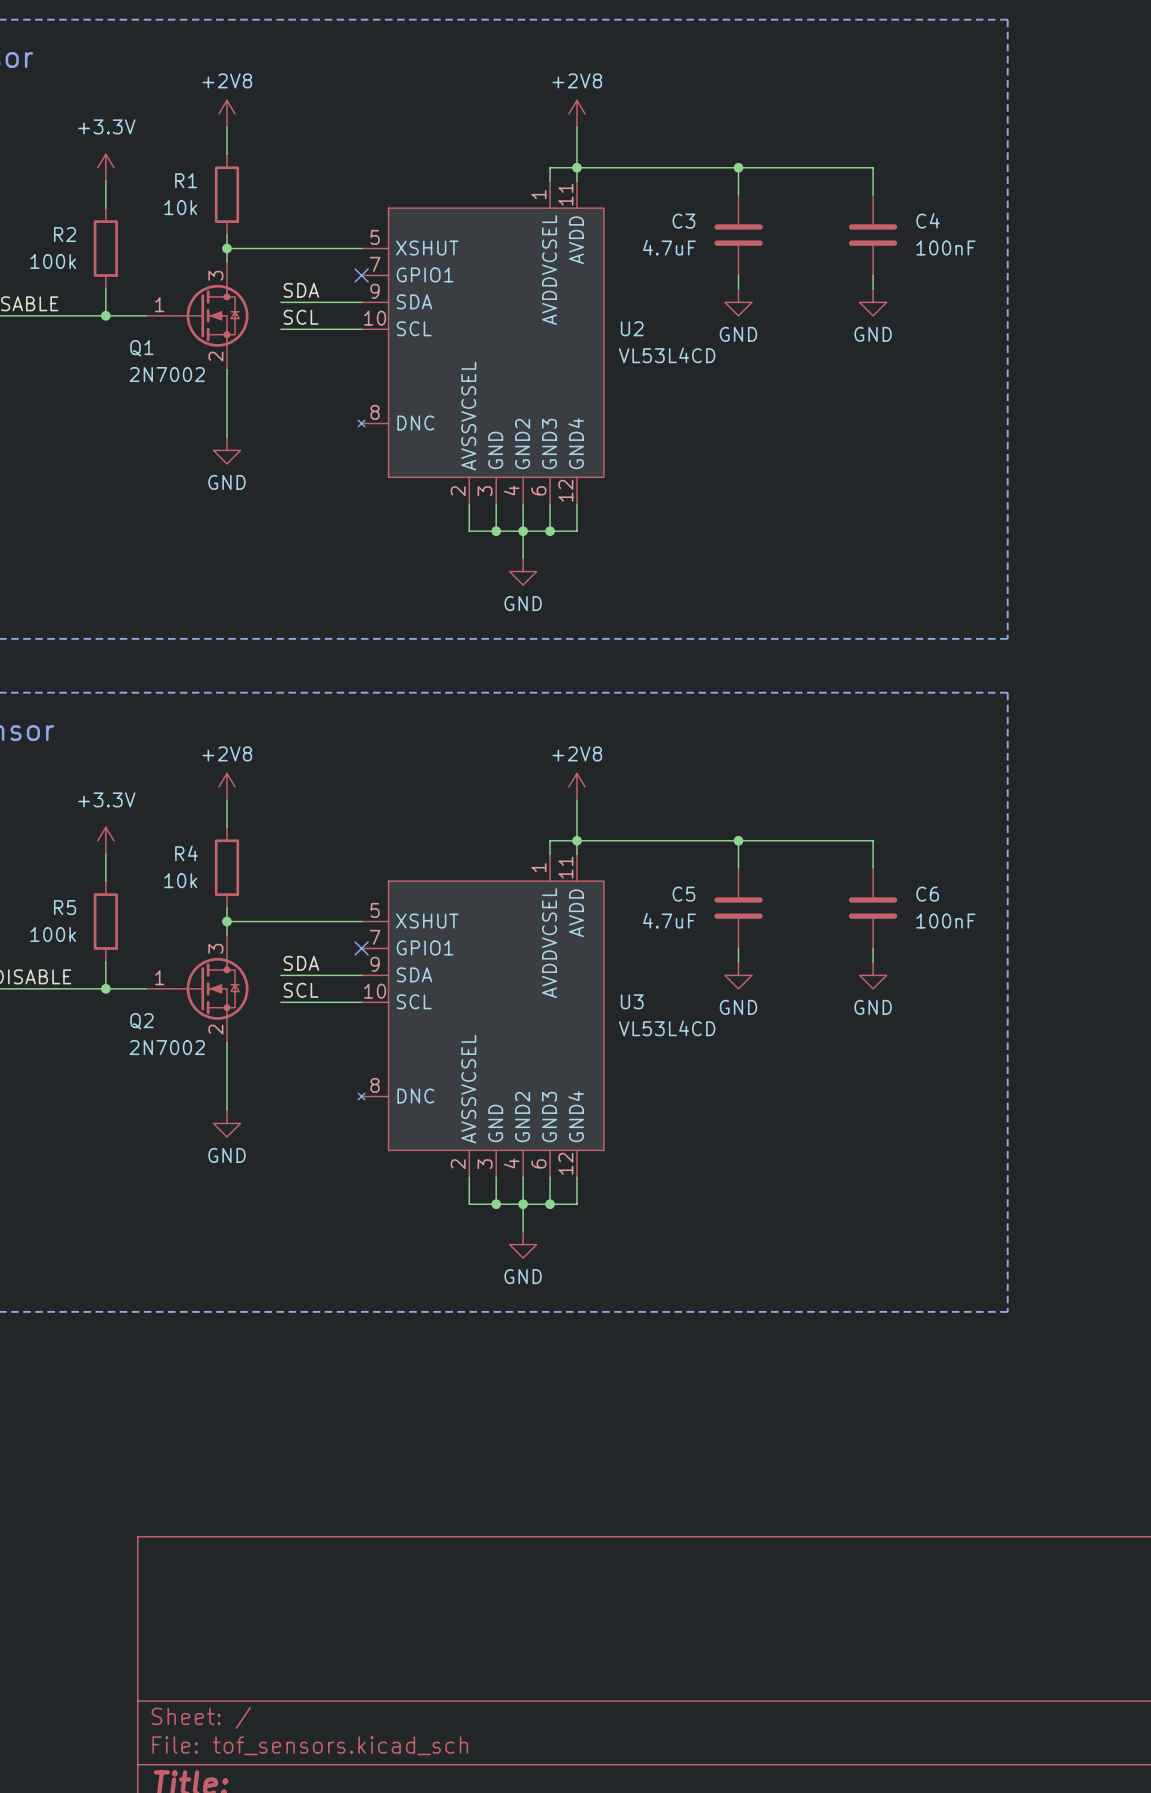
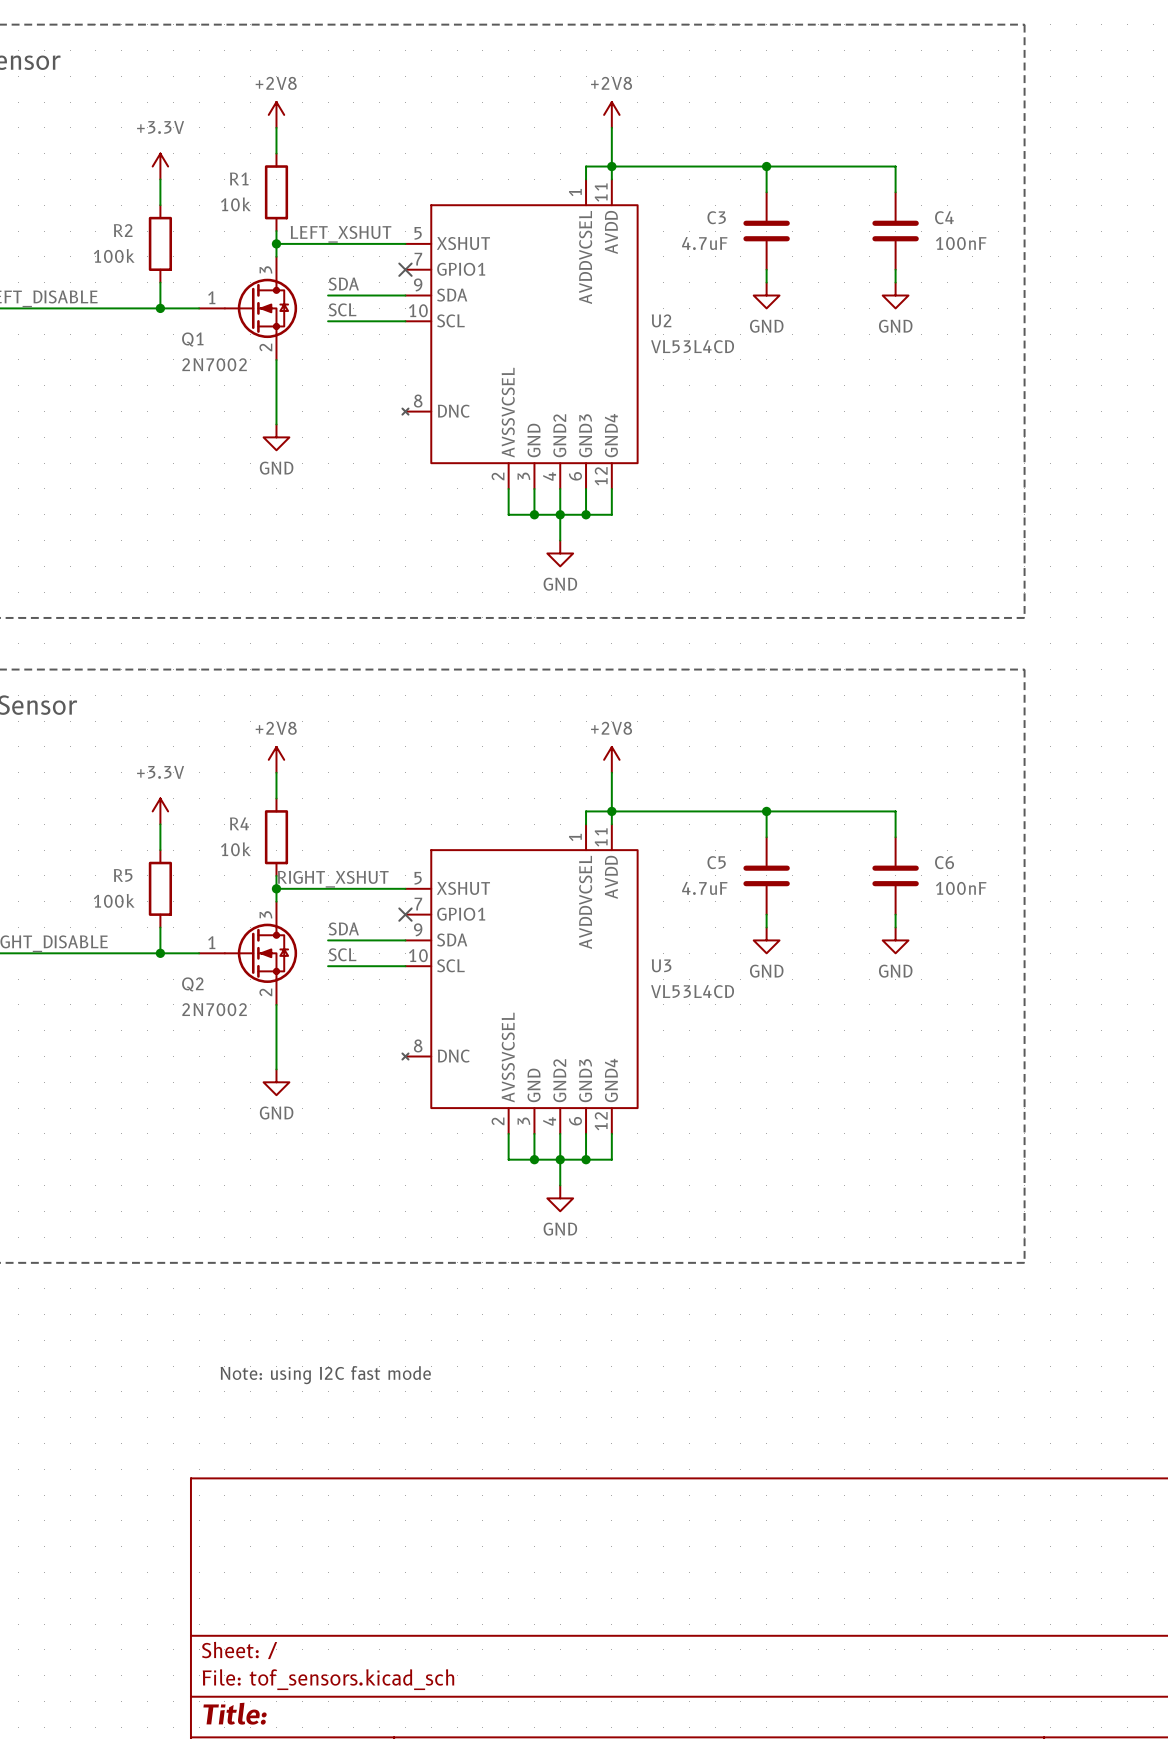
label: none -> LEFT_XSHUT (341, 234)
label: none -> RIGHT_XSHUT (333, 879)
text: none -> Note: using I2C fast mode (325, 1375)

